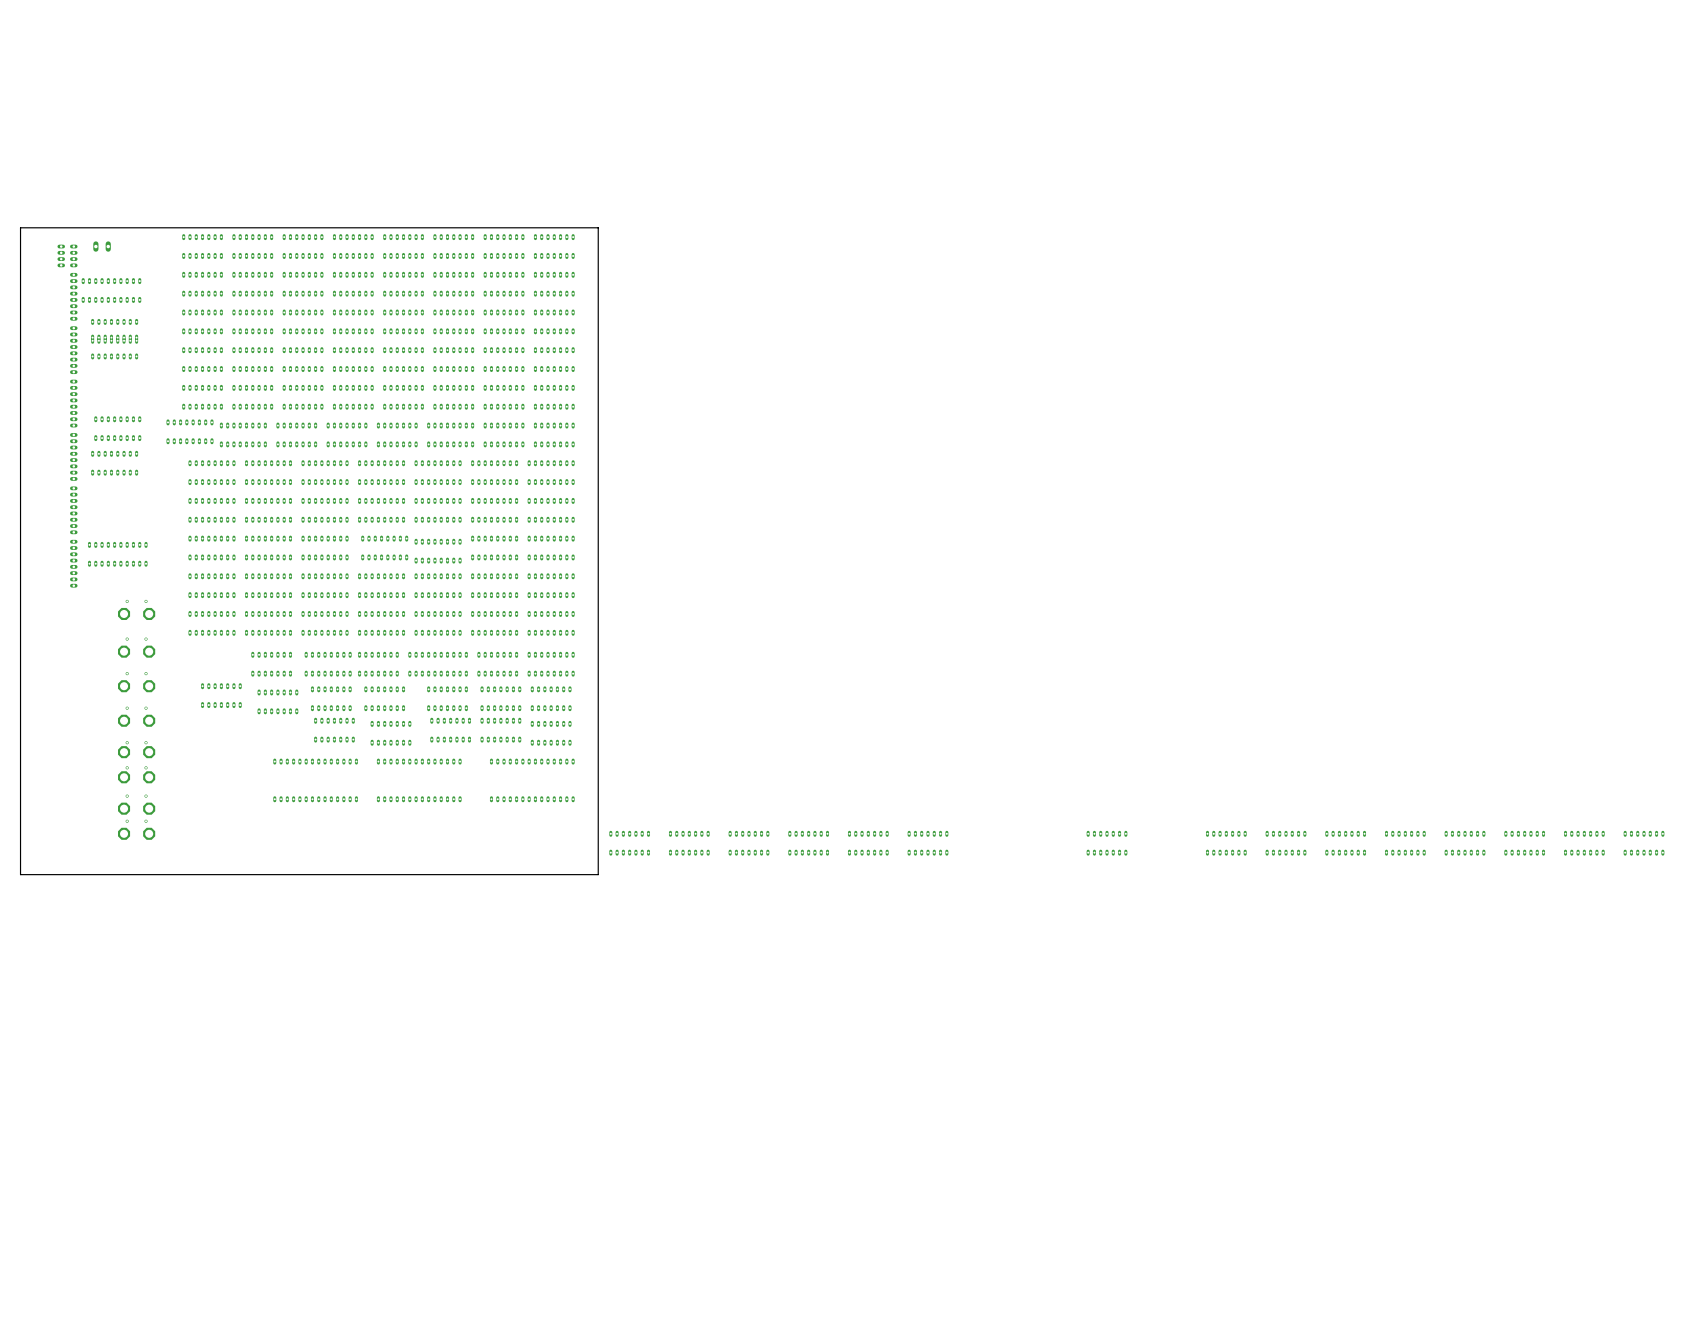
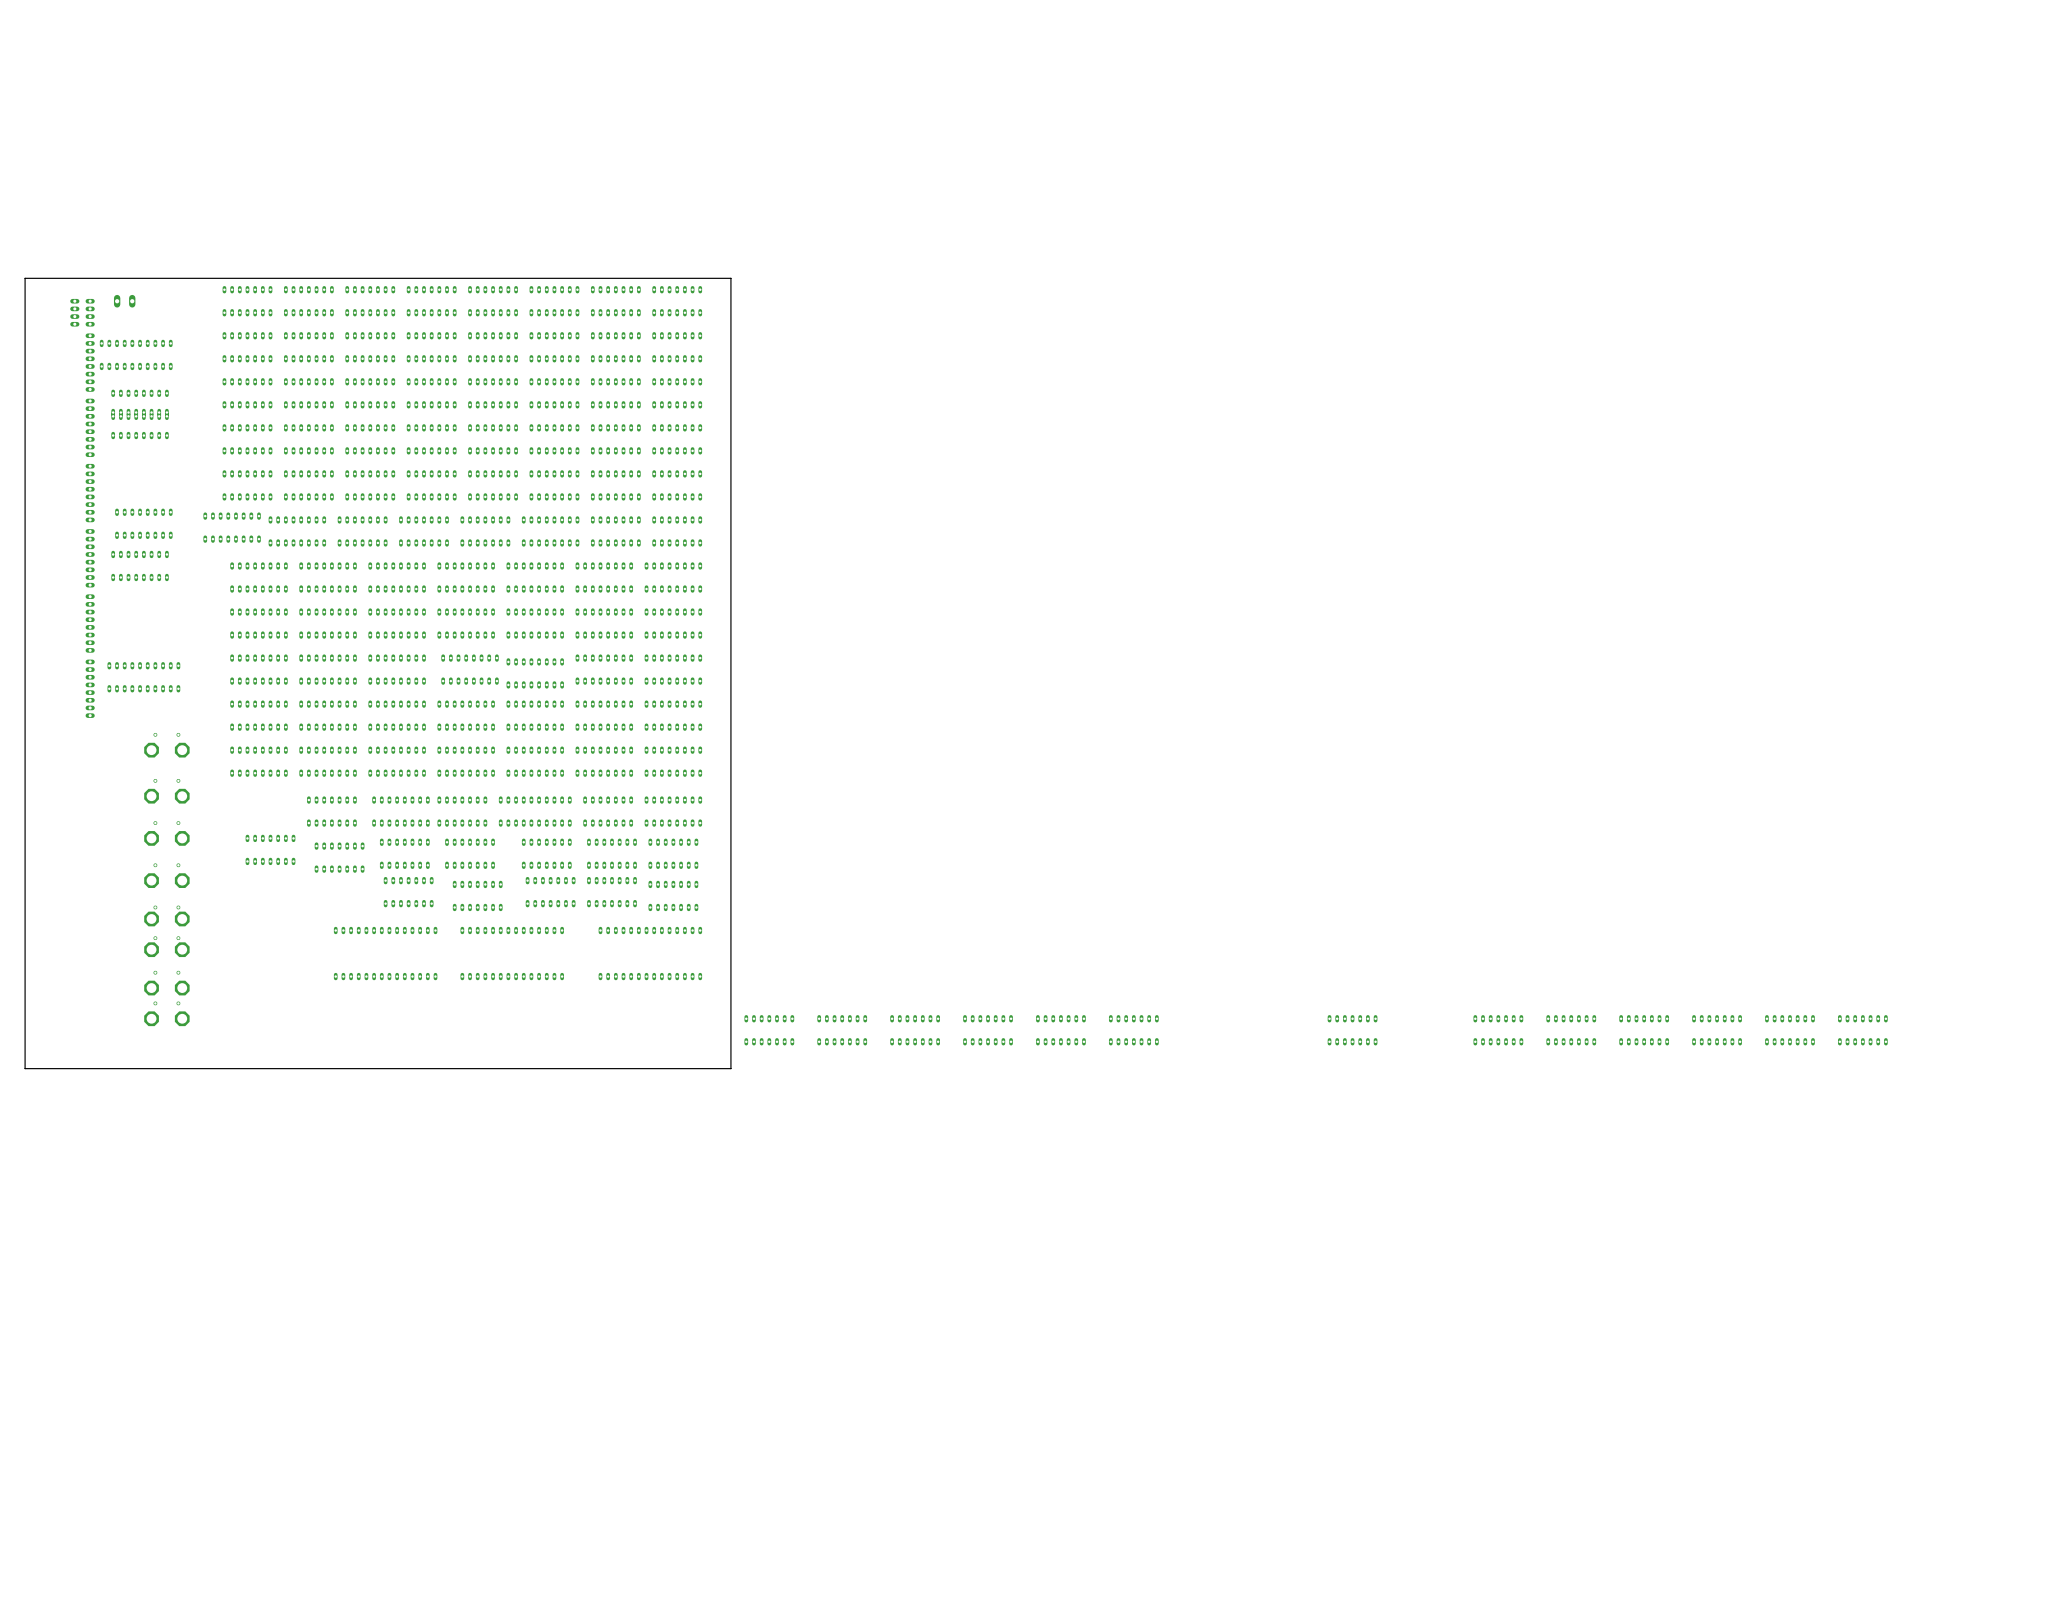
part: (1584, 843) -> none
part: (1644, 843) -> none

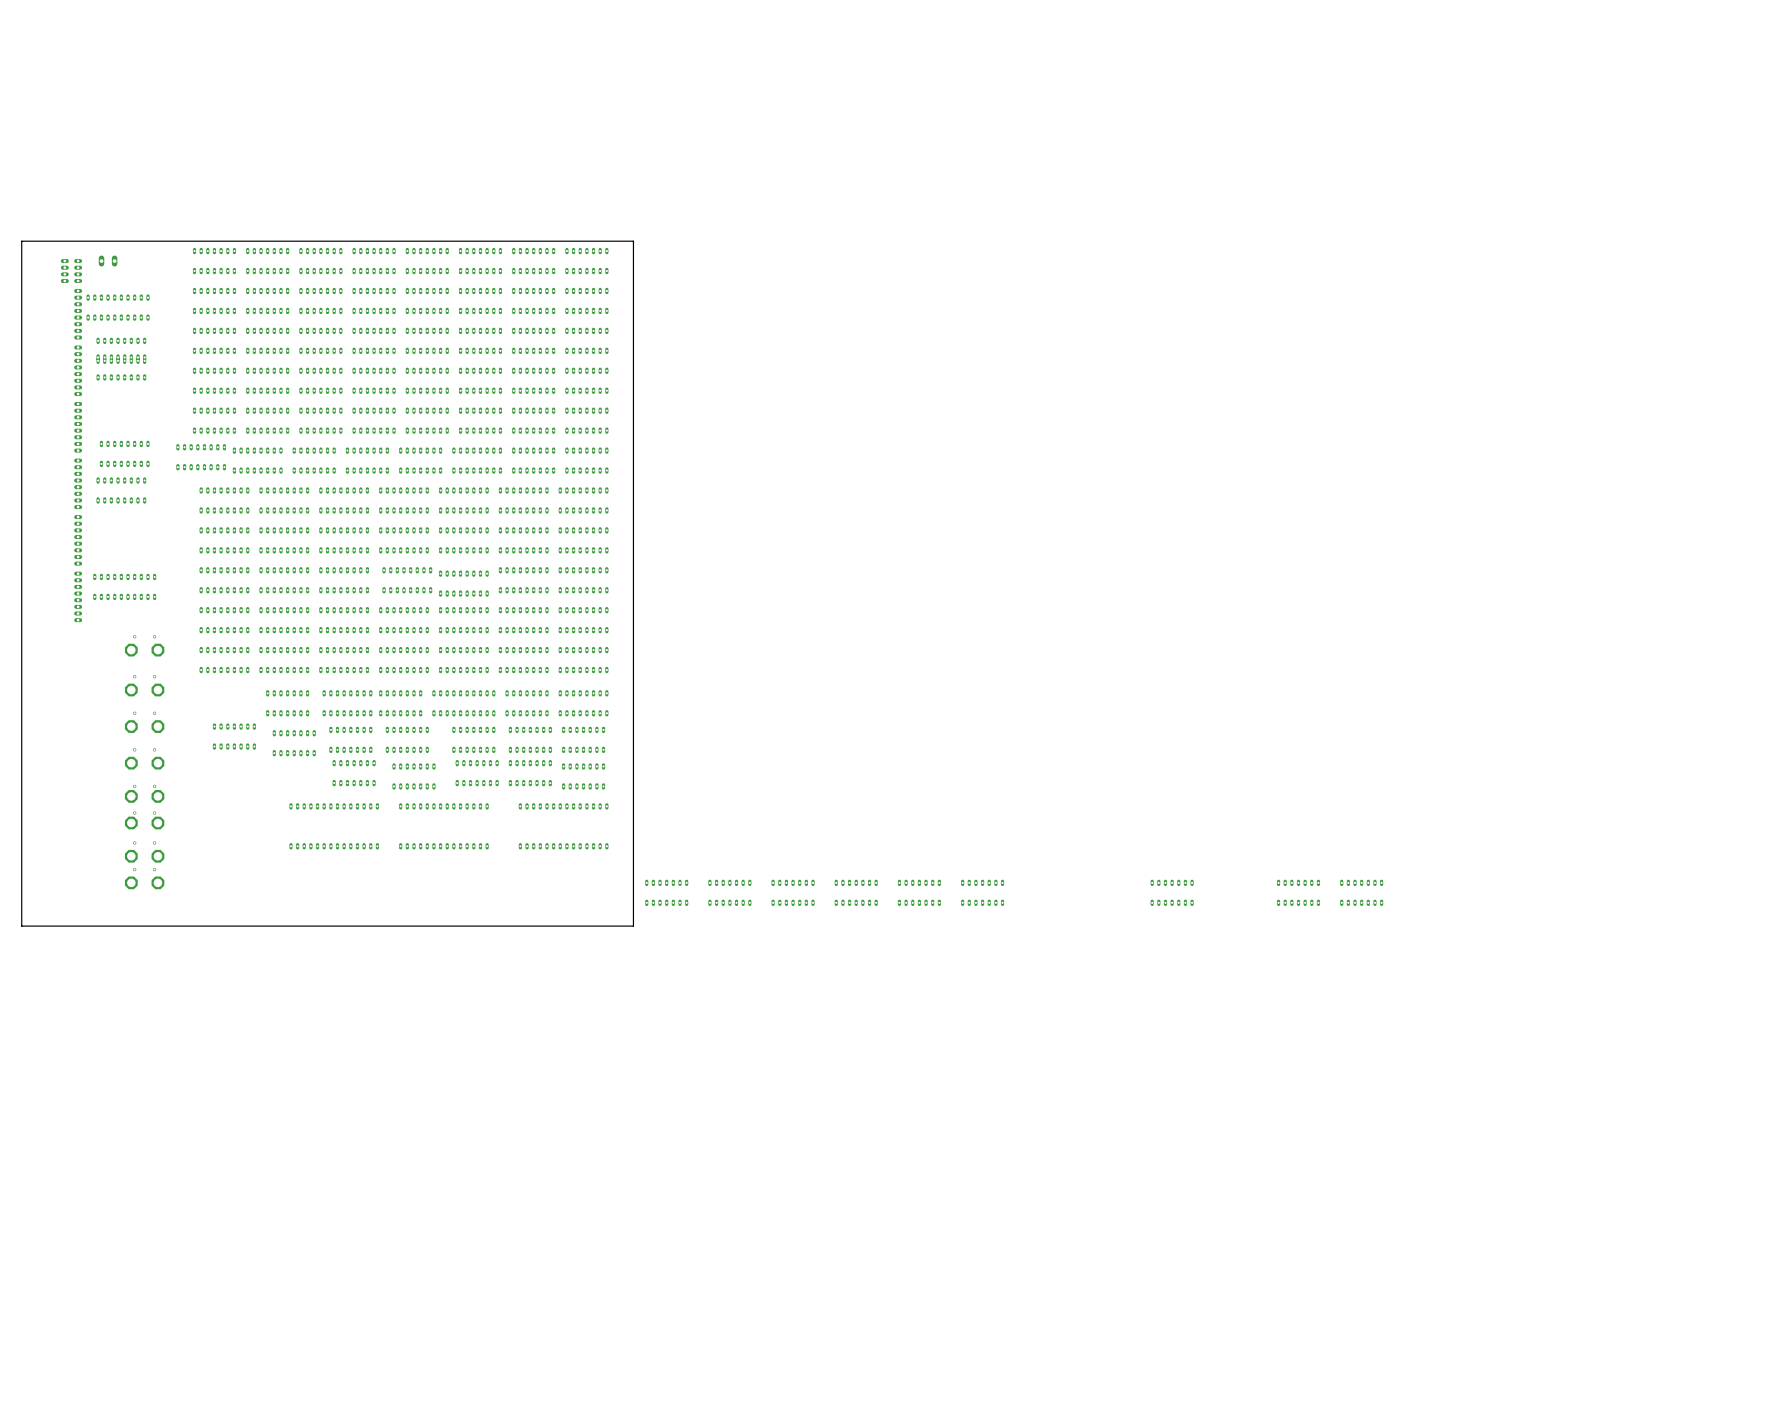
part: (1644, 1030) -> none
part: (1717, 1030) -> none
part: (1789, 1030) -> none
part: (1862, 1030) -> none

